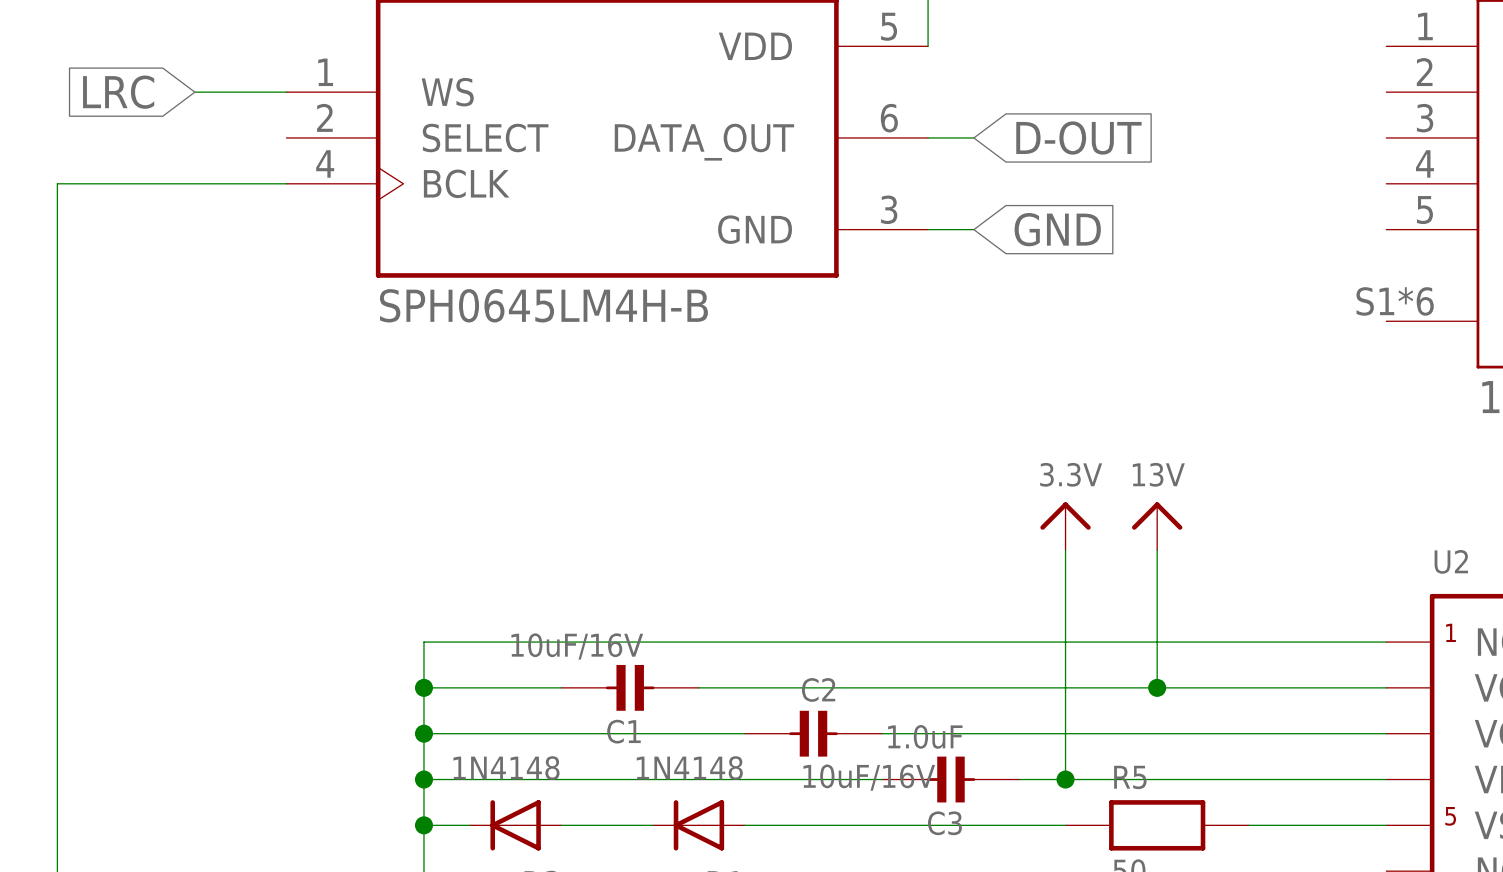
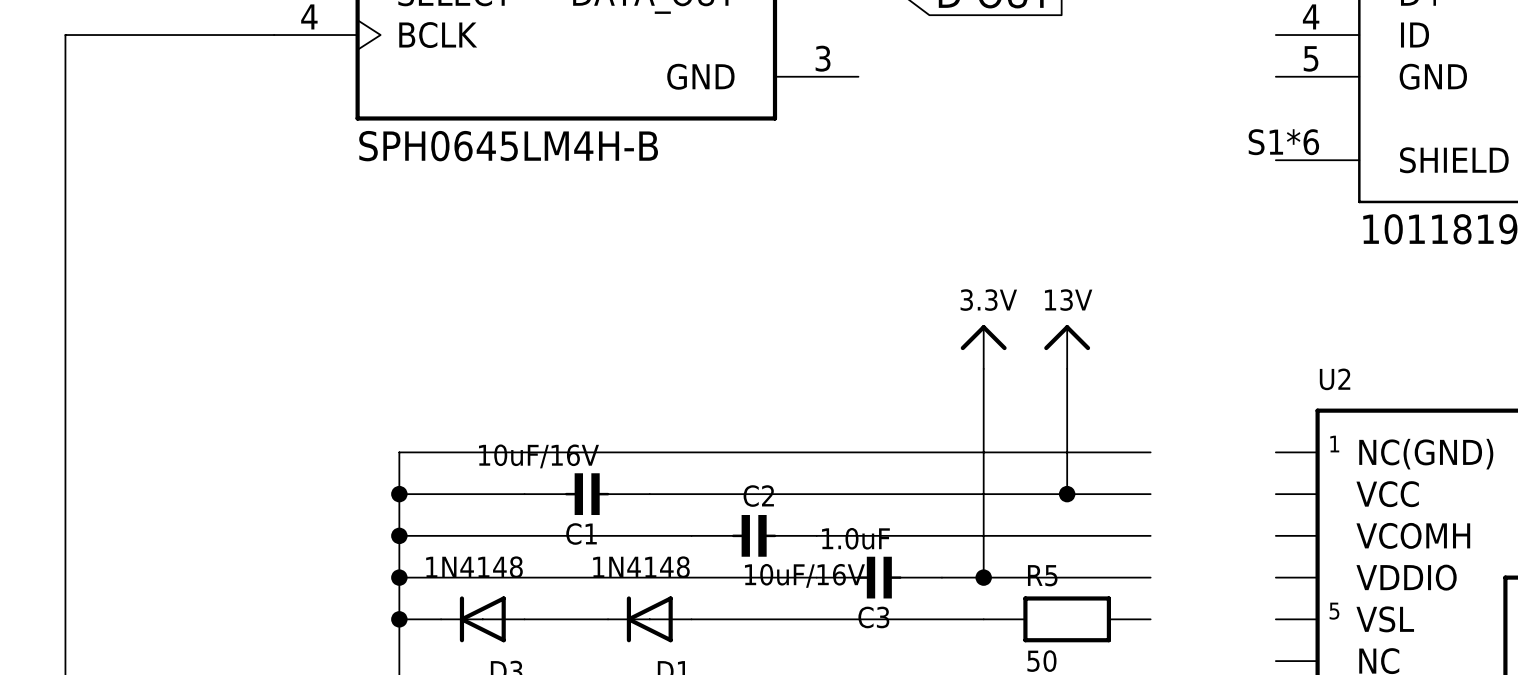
wire: (928, 229) (973, 229) -> none
global label: GND (1057, 229) -> none
wire: (1248, 642) (1386, 642) -> none
wire: (1248, 687) (1386, 687) -> none
wire: (1248, 733) (1386, 733) -> none
wire: (1248, 779) (1386, 779) -> none
wire: (1248, 825) (1386, 825) -> none

